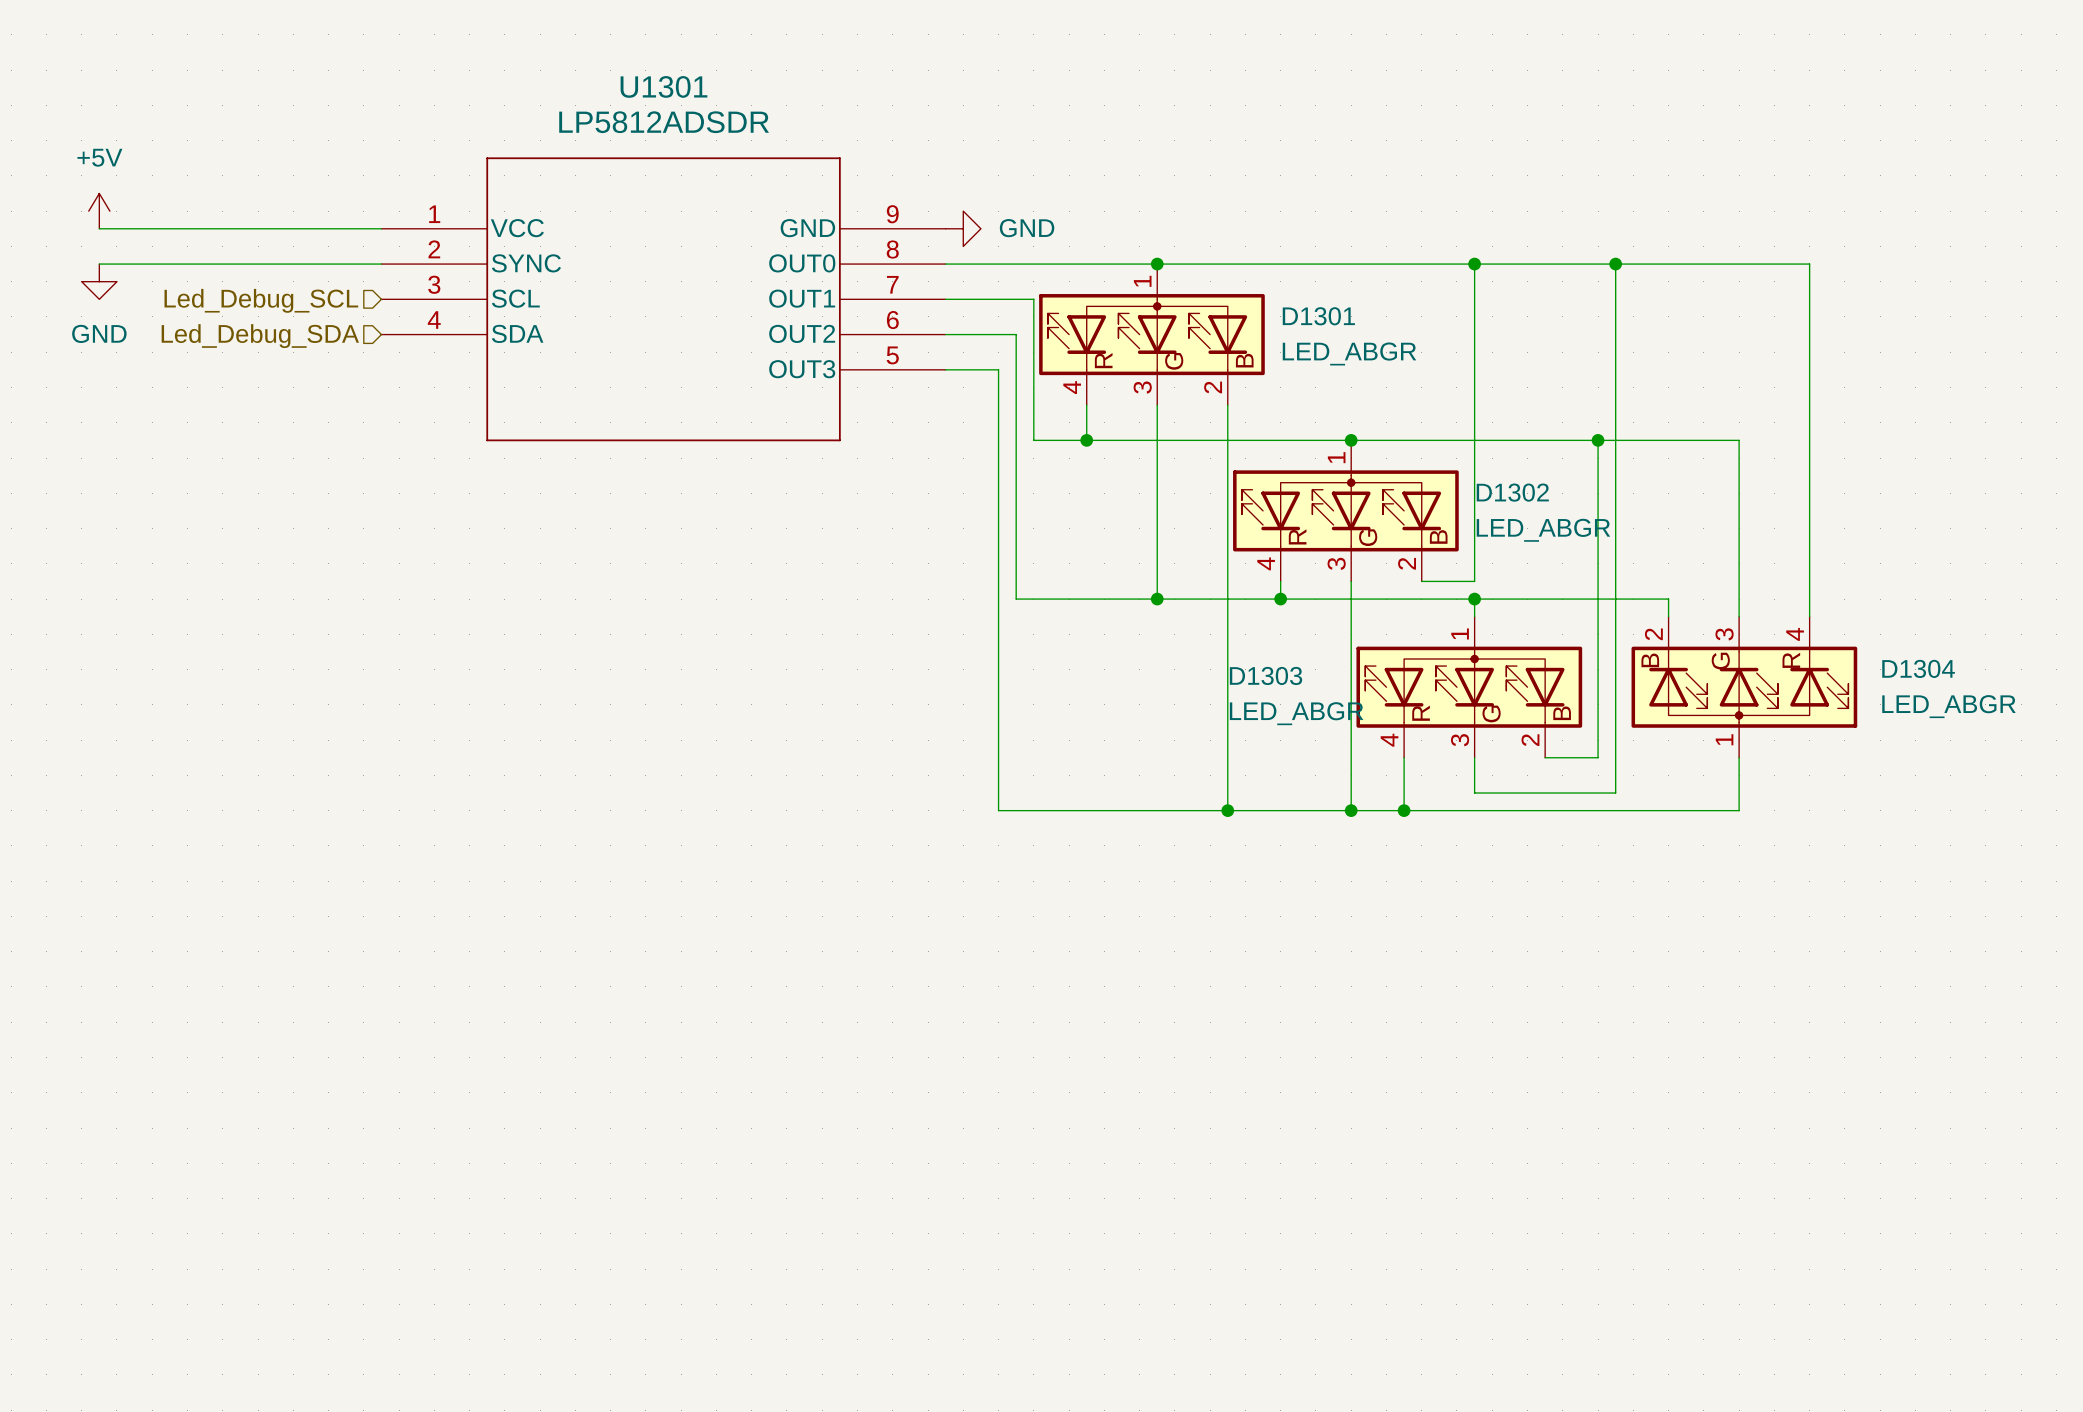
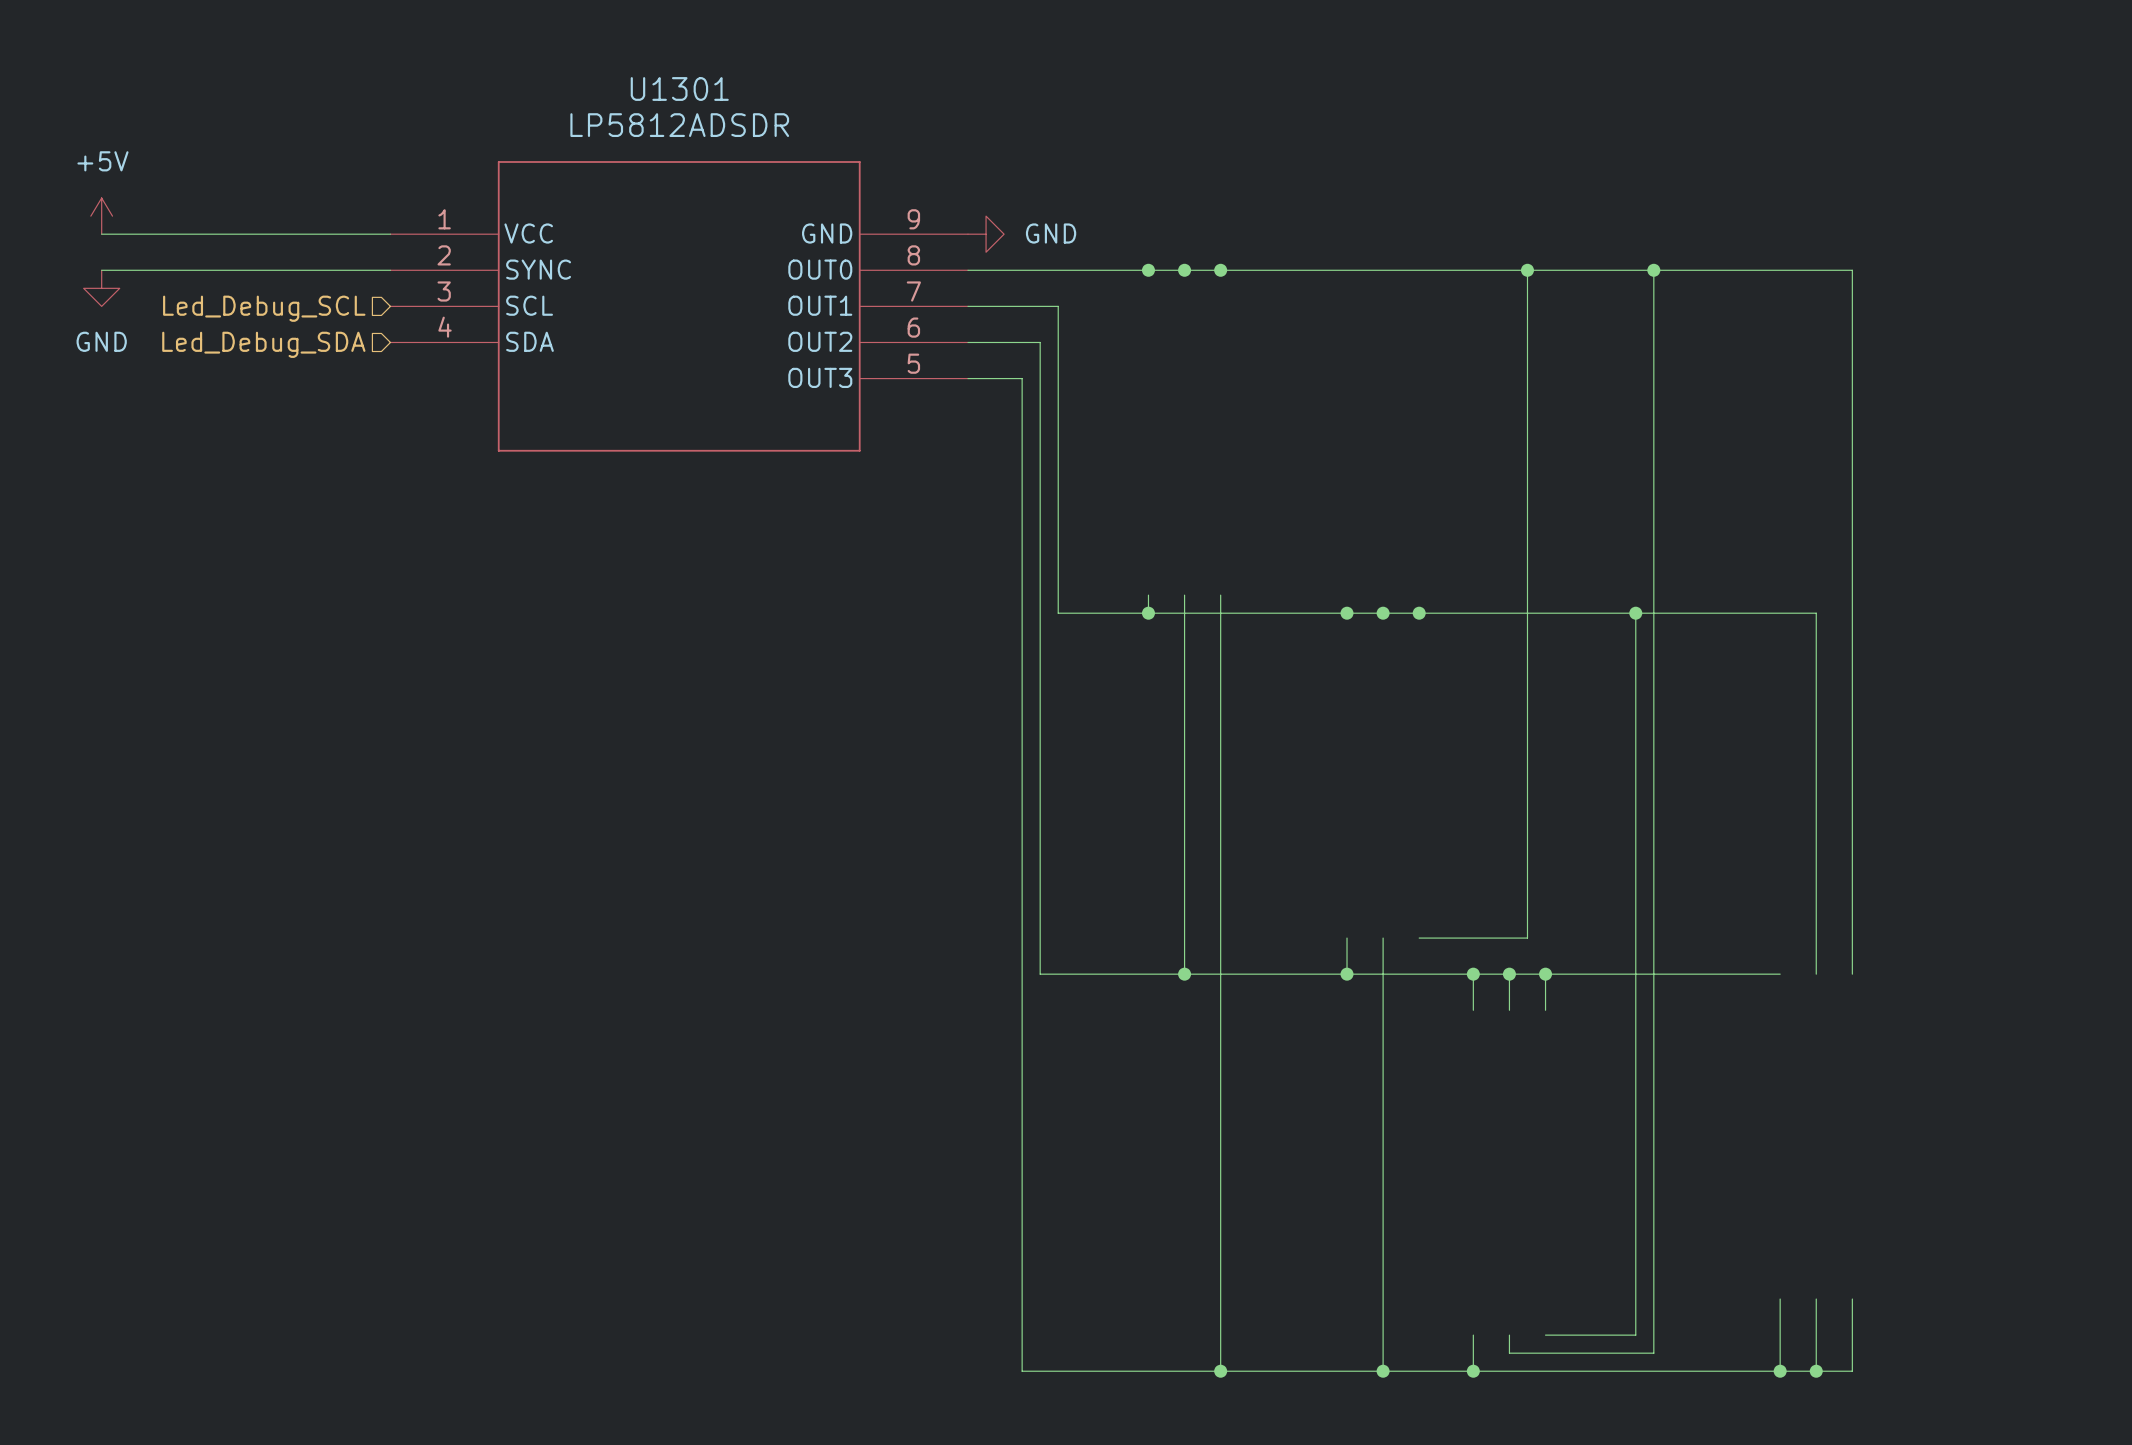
junction: none -> (1148, 270)
junction: none -> (1220, 270)
wire: (1474, 264) (1474, 581) (1421, 581) -> none
junction position: (1474, 264) -> (1527, 270)
wire: none -> (1527, 270) (1527, 938) (1419, 938)
D1301: LED_ABGR (1151, 334) -> none
wire: (1086, 405) (1086, 440) -> none
wire: (1157, 405) (1157, 581) -> none
wire: (1227, 405) (1227, 810) -> none
wire: (1033, 440) (1739, 440) (1739, 616) -> none
junction: (1086, 440) -> none
junction: (1351, 440) -> none
wire: (1598, 440) (1598, 599) -> none
junction: (1598, 440) -> none
D1302: LED_ABGR (1345, 510) -> none
wire: none -> (1220, 595) (1220, 1371)
wire: (1280, 581) (1280, 599) -> (1148, 595) (1148, 613)
wire: (1351, 581) (1351, 810) -> none
wire: (1016, 599) (1033, 599) -> (1058, 450) (1058, 613)
wire: none -> (1040, 613) (1040, 974) (1780, 974)
wire: none -> (1184, 613) (1184, 974)
junction position: (1157, 599) -> (1148, 613)
junction: (1280, 599) -> none
junction: none -> (1347, 613)
junction: none -> (1383, 613)
junction: none -> (1419, 613)
wire: (1474, 599) (1474, 616) -> none
junction: (1474, 599) -> none
junction: none -> (1635, 613)
wire: (1668, 599) (1668, 616) -> (1707, 613) (1816, 613) (1816, 974)
wire: none -> (1852, 631) (1852, 974)
D1303: LED_ABGR (1469, 687) -> none
D1304: LED_ABGR (1744, 687) -> none
wire: (1404, 757) (1404, 810) -> none
wire: (1474, 757) (1474, 793) (1615, 793) -> (1509, 1335) (1509, 1353) (1653, 1353) (1653, 811)
wire: (1545, 757) (1598, 757) -> (1545, 1335) (1635, 1335) (1635, 775)
wire: (1739, 757) (1739, 810) (998, 810) -> (1852, 1299) (1852, 1371) (1022, 1371) (1022, 829)
junction: (1227, 810) -> none
junction: (1351, 810) -> none
junction: (1404, 810) -> none
wire: none -> (1347, 938) (1347, 974)
wire: none -> (1383, 938) (1383, 1371)
junction: none -> (1184, 974)
junction: none -> (1347, 974)
wire: none -> (1473, 974) (1473, 1010)
junction: none -> (1473, 974)
wire: none -> (1509, 974) (1509, 1010)
junction: none -> (1509, 974)
wire: none -> (1545, 974) (1545, 1010)
junction: none -> (1545, 974)
wire: none -> (1780, 1299) (1780, 1371)
wire: none -> (1816, 1299) (1816, 1371)
wire: none -> (1473, 1335) (1473, 1371)
junction: none -> (1220, 1371)
junction: none -> (1383, 1371)
junction: none -> (1473, 1371)
junction: none -> (1780, 1371)
junction: none -> (1816, 1371)

